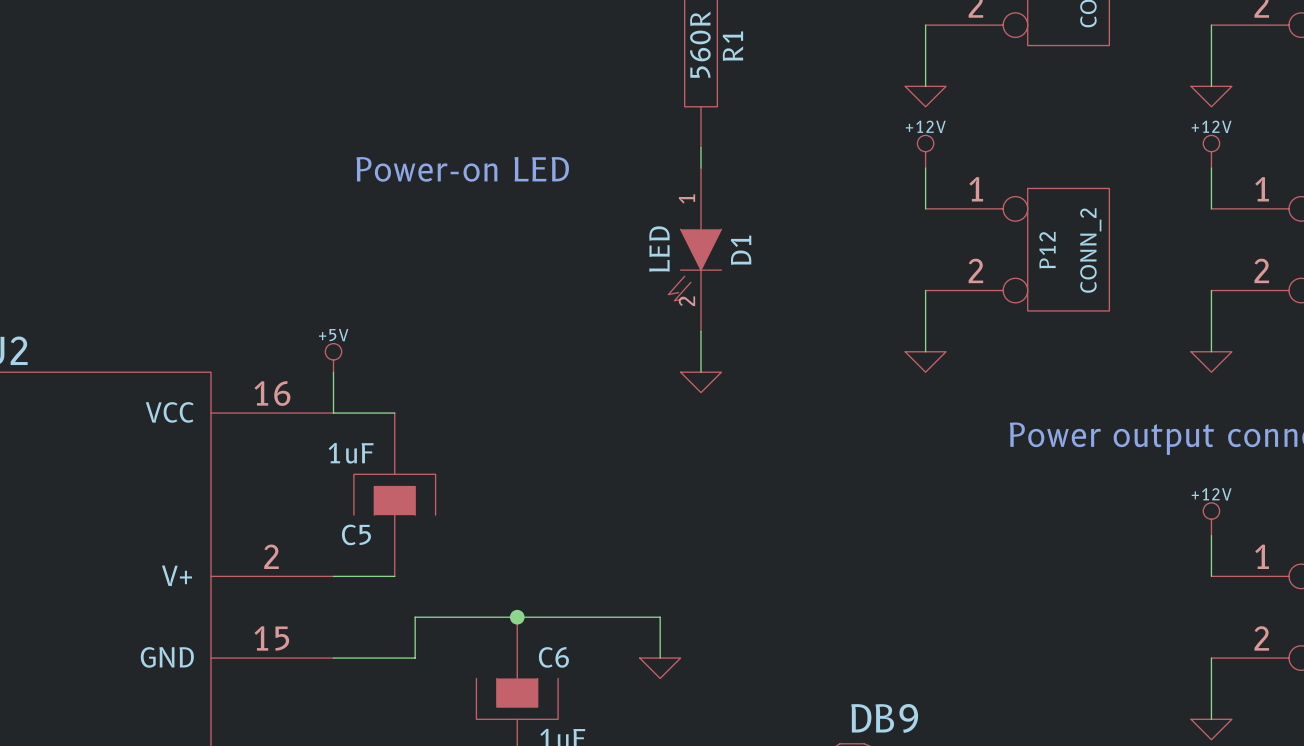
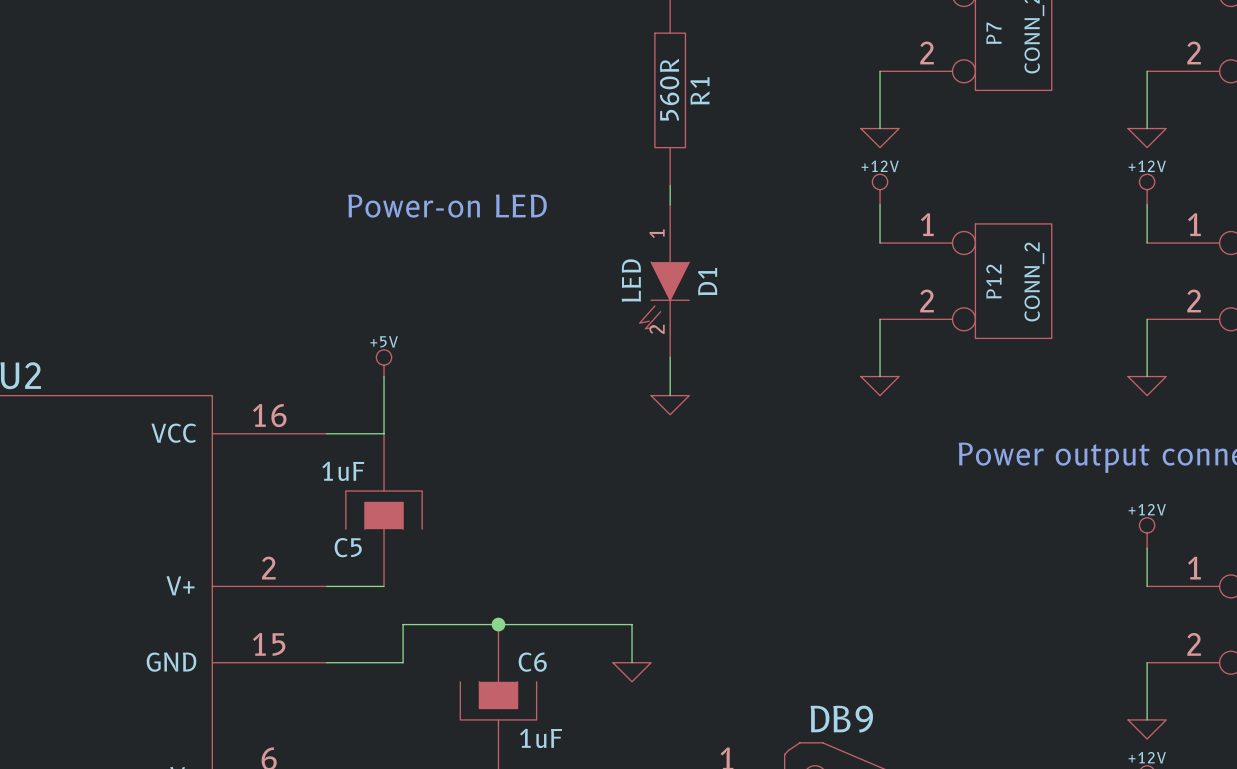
wire: none -> (384, 376) (384, 433)
power symbol position: +5V (333, 357) -> +5V (384, 363)
wire: (333, 372) (333, 413) -> none

